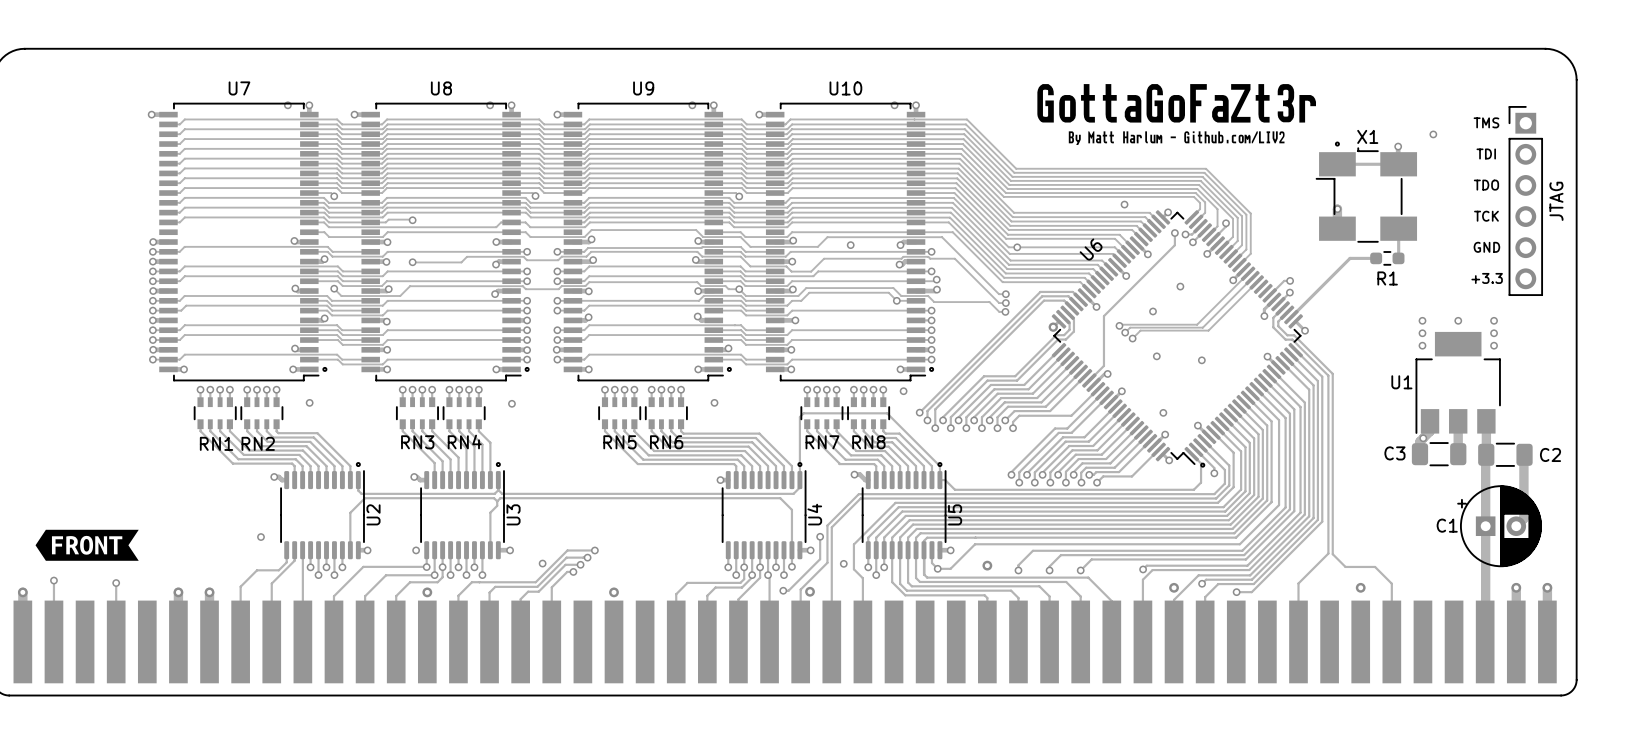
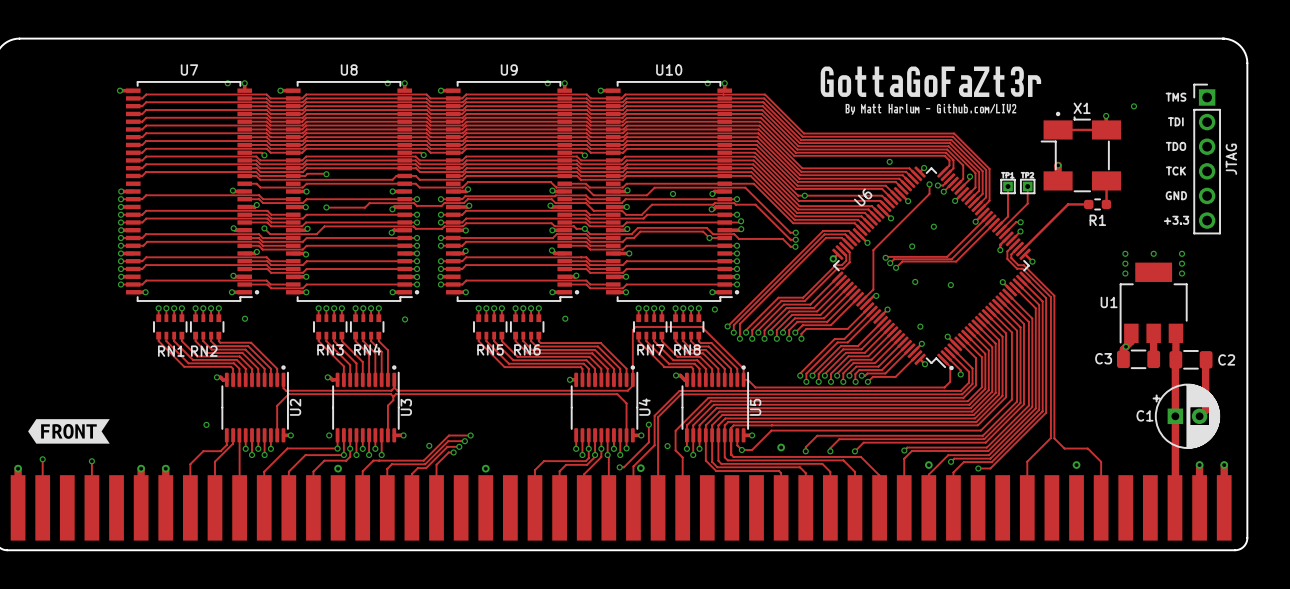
track: none -> (1008, 186) (1008, 216) (997, 226)
part: none -> (1008, 186)
track: none -> (1027, 186) (1027, 203) (1001, 230)
part: none -> (1027, 186)

